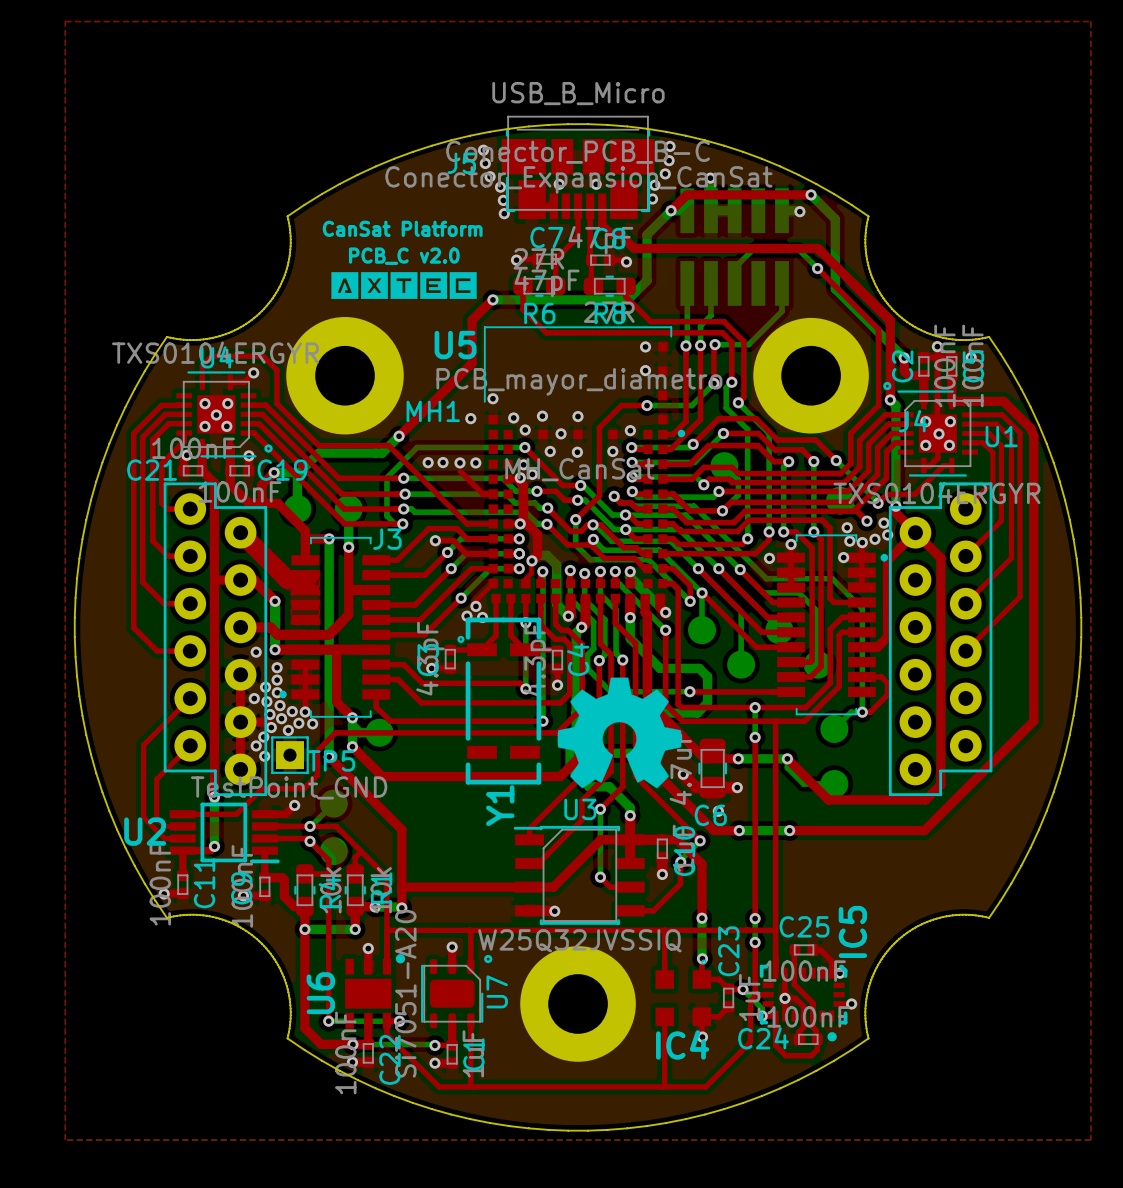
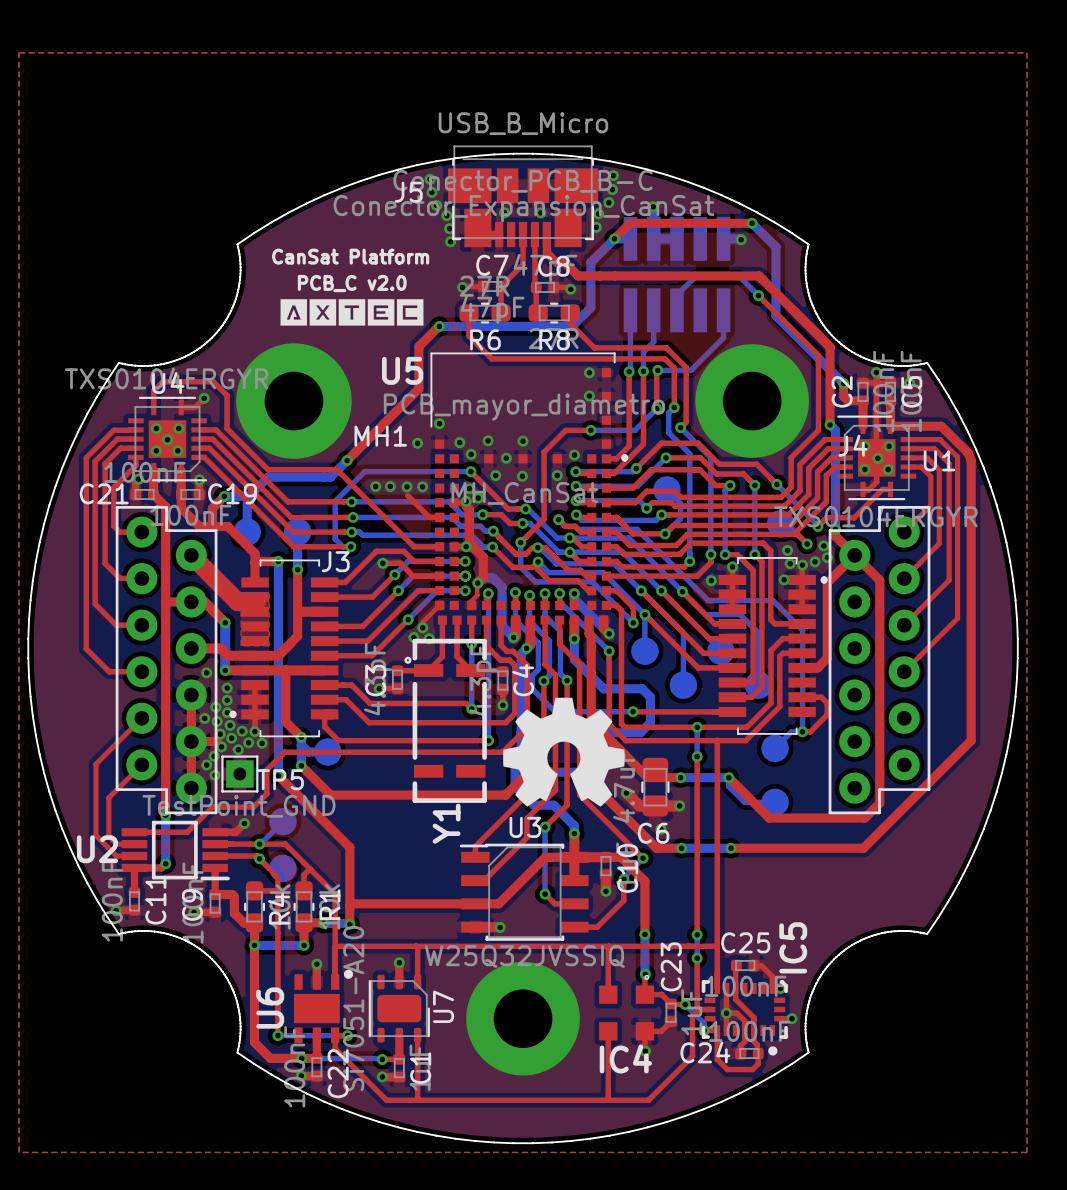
drawing: [883, 381, 892, 391] -> none
drawing: [264, 444, 273, 453] -> none
drawing: [484, 954, 493, 964] -> none

